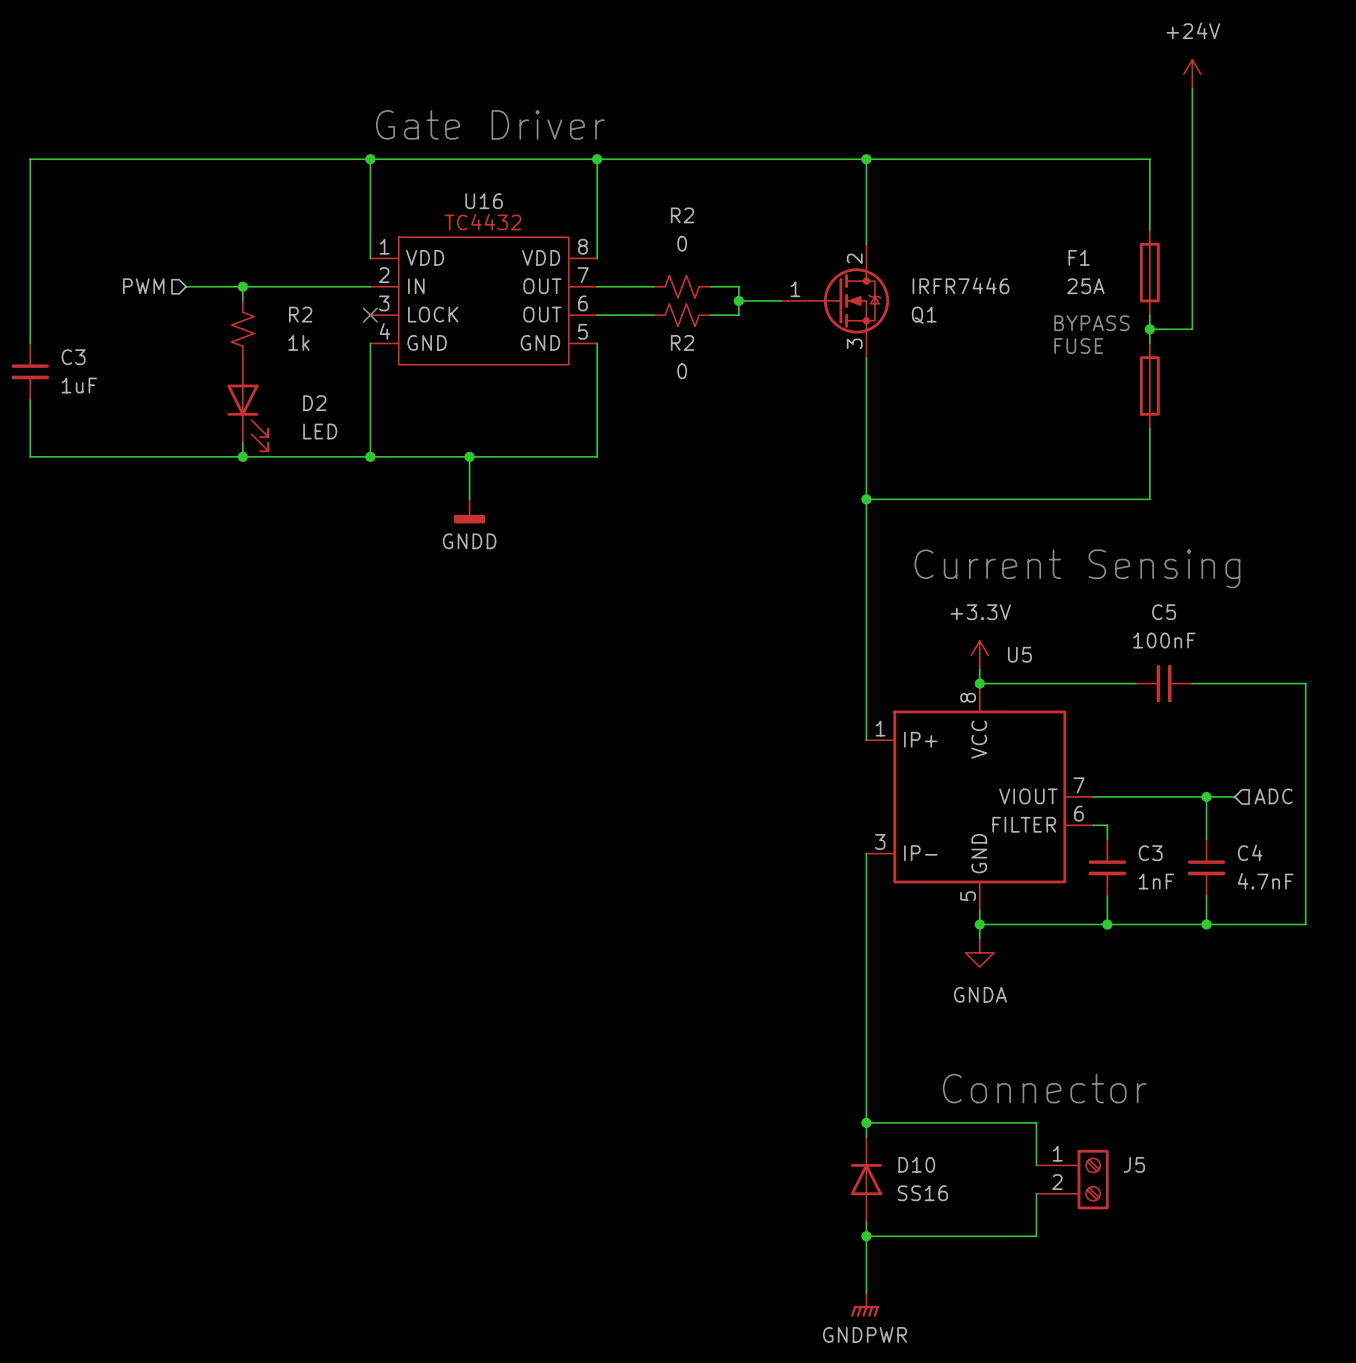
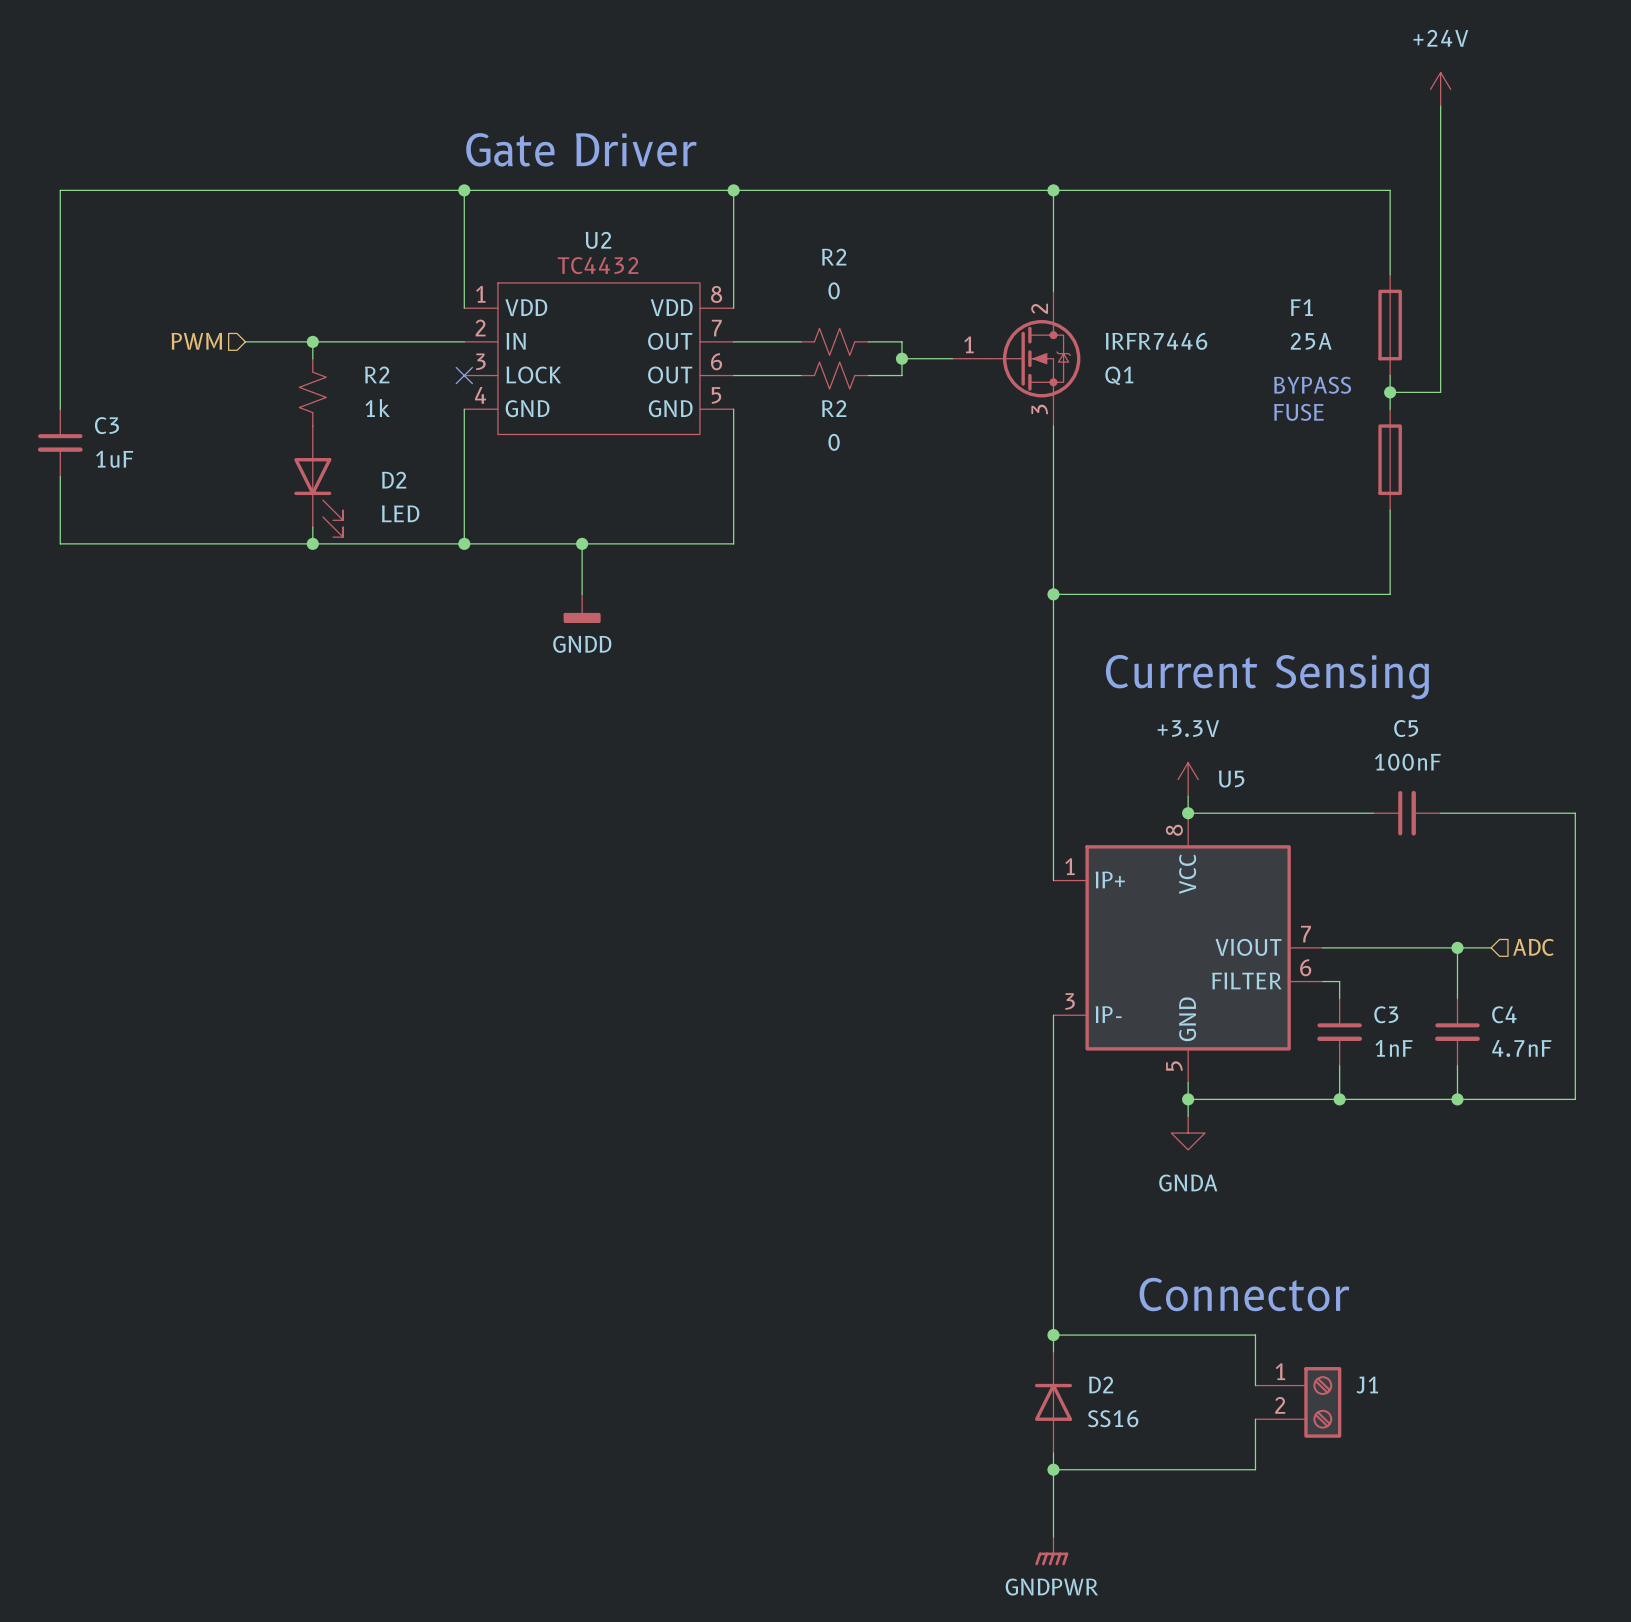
U16 name: U16 (484, 201) -> U2 (598, 240)
D10 name: D10 (916, 1164) -> D2 (1101, 1384)
J5 name: J5 (1134, 1164) -> J1 (1367, 1385)

